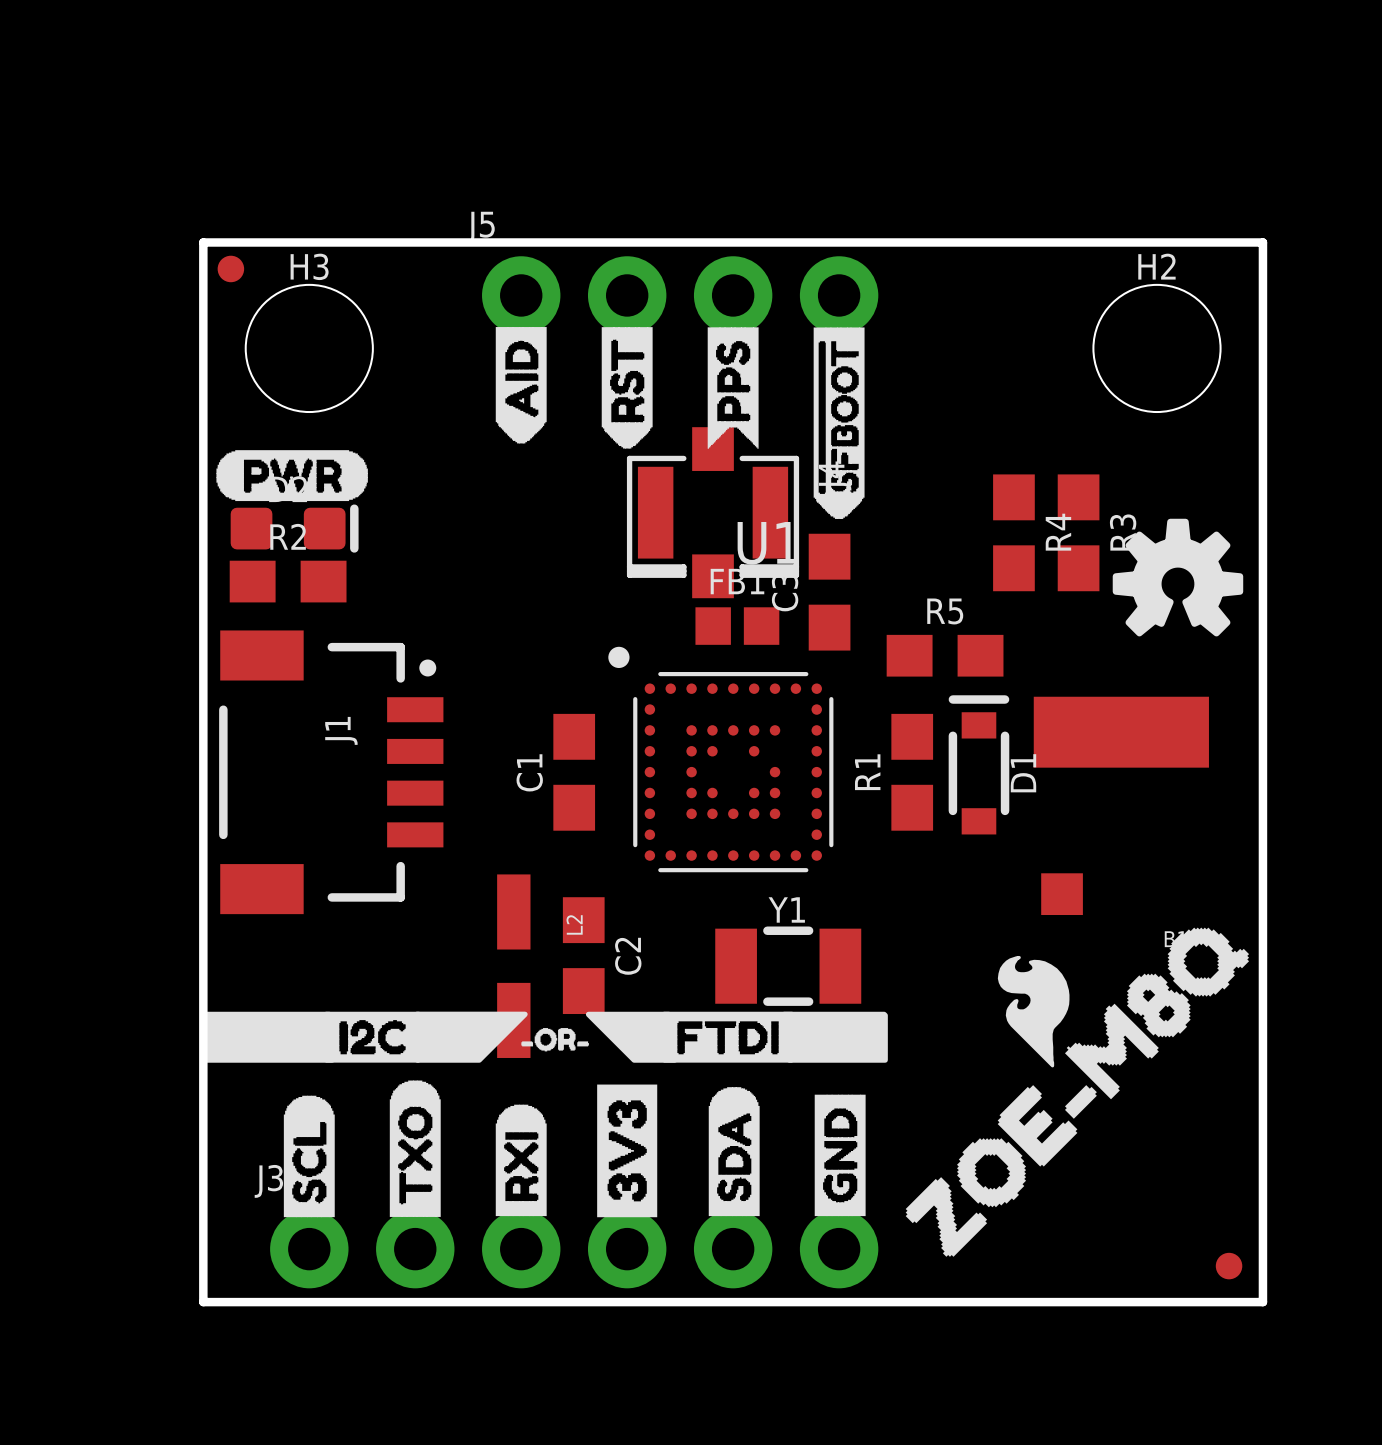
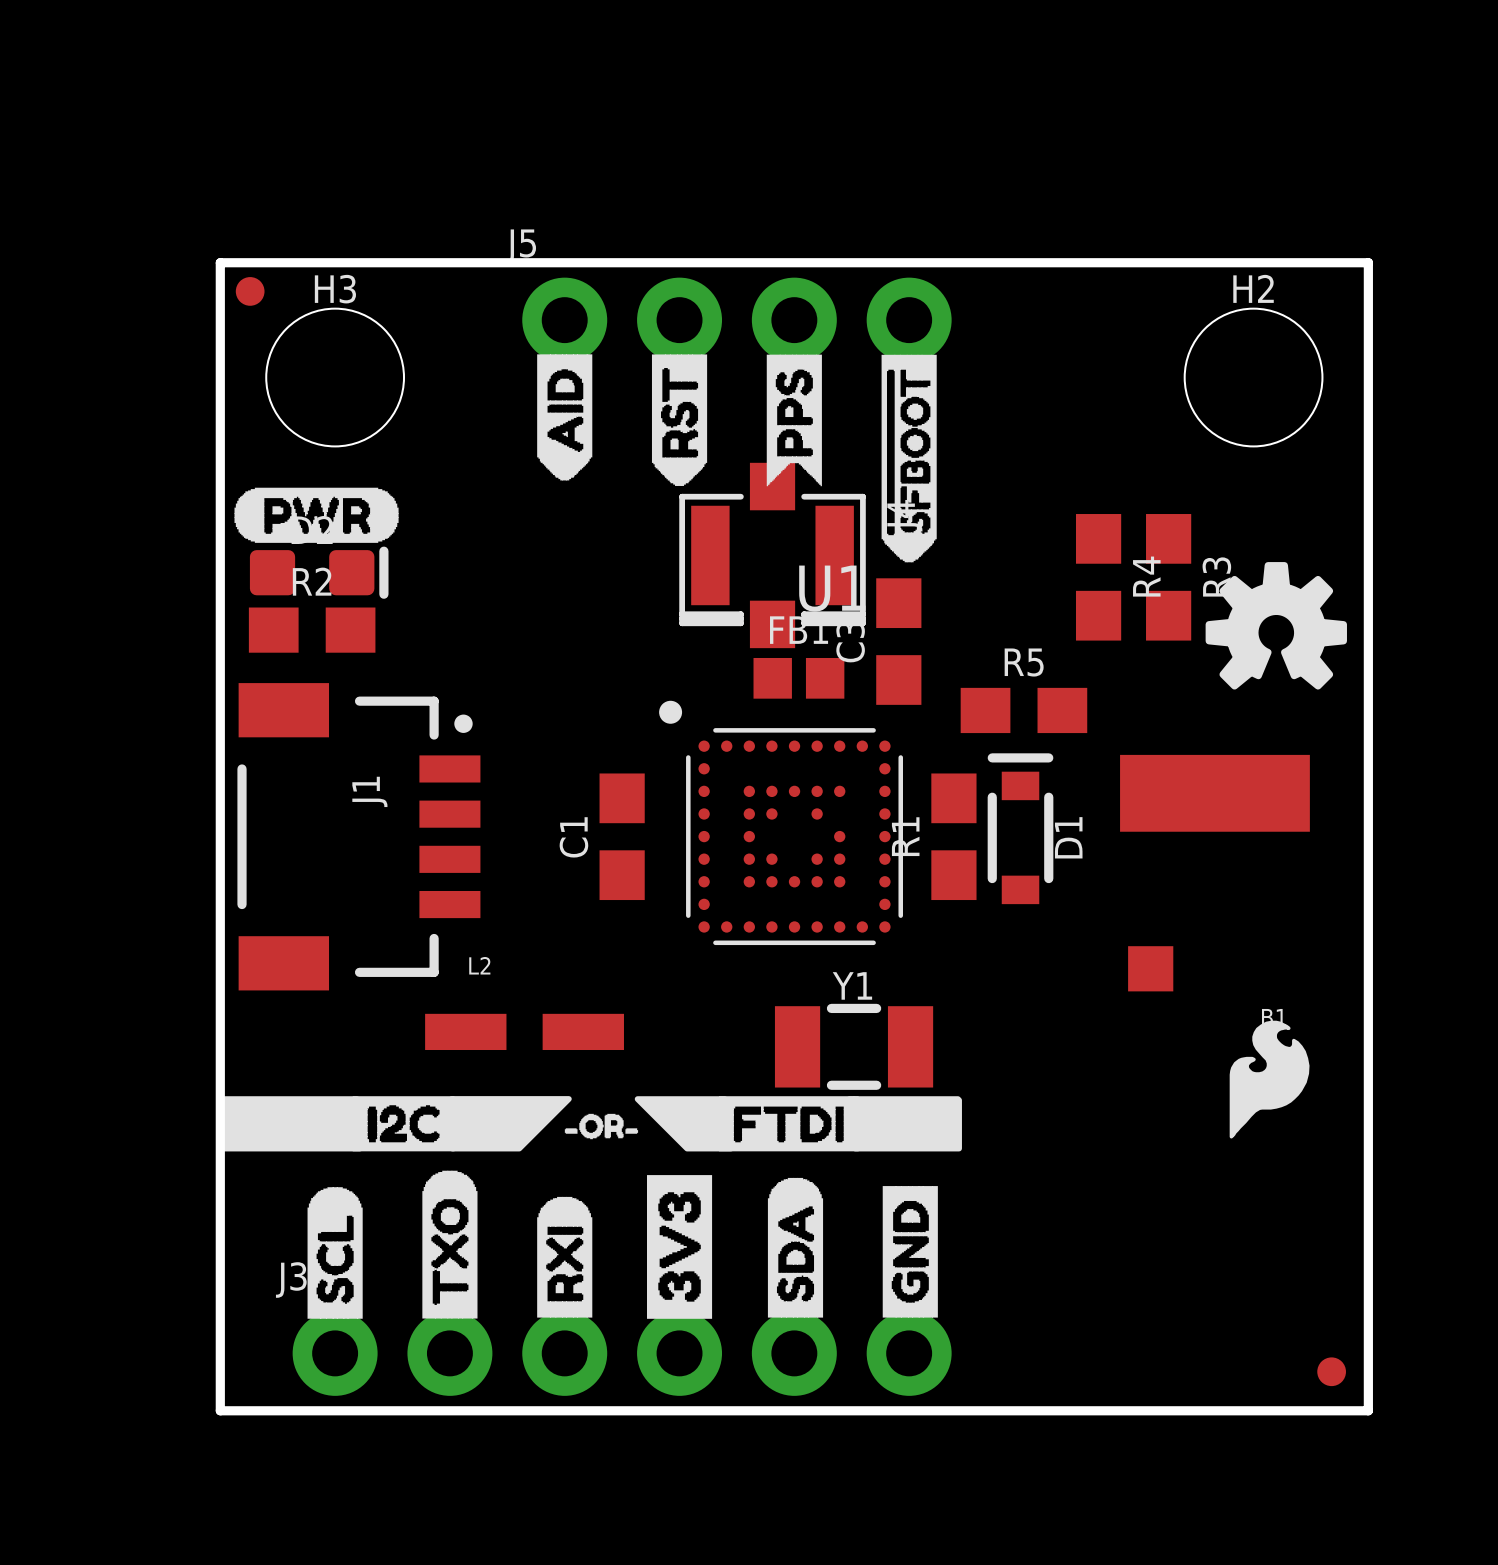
D1 position: (978, 764) -> (1020, 828)
R1 position: (912, 772) -> (953, 836)
L2 name position: L2 (574, 924) -> L2 (479, 965)
drawing: [905, 927, 1250, 1257] -> none
drawing: none -> [1229, 1020, 1310, 1139]
C2: (583, 955) -> none
L2 rotation: 0° (513, 966) -> 90° clockwise (524, 1031)

